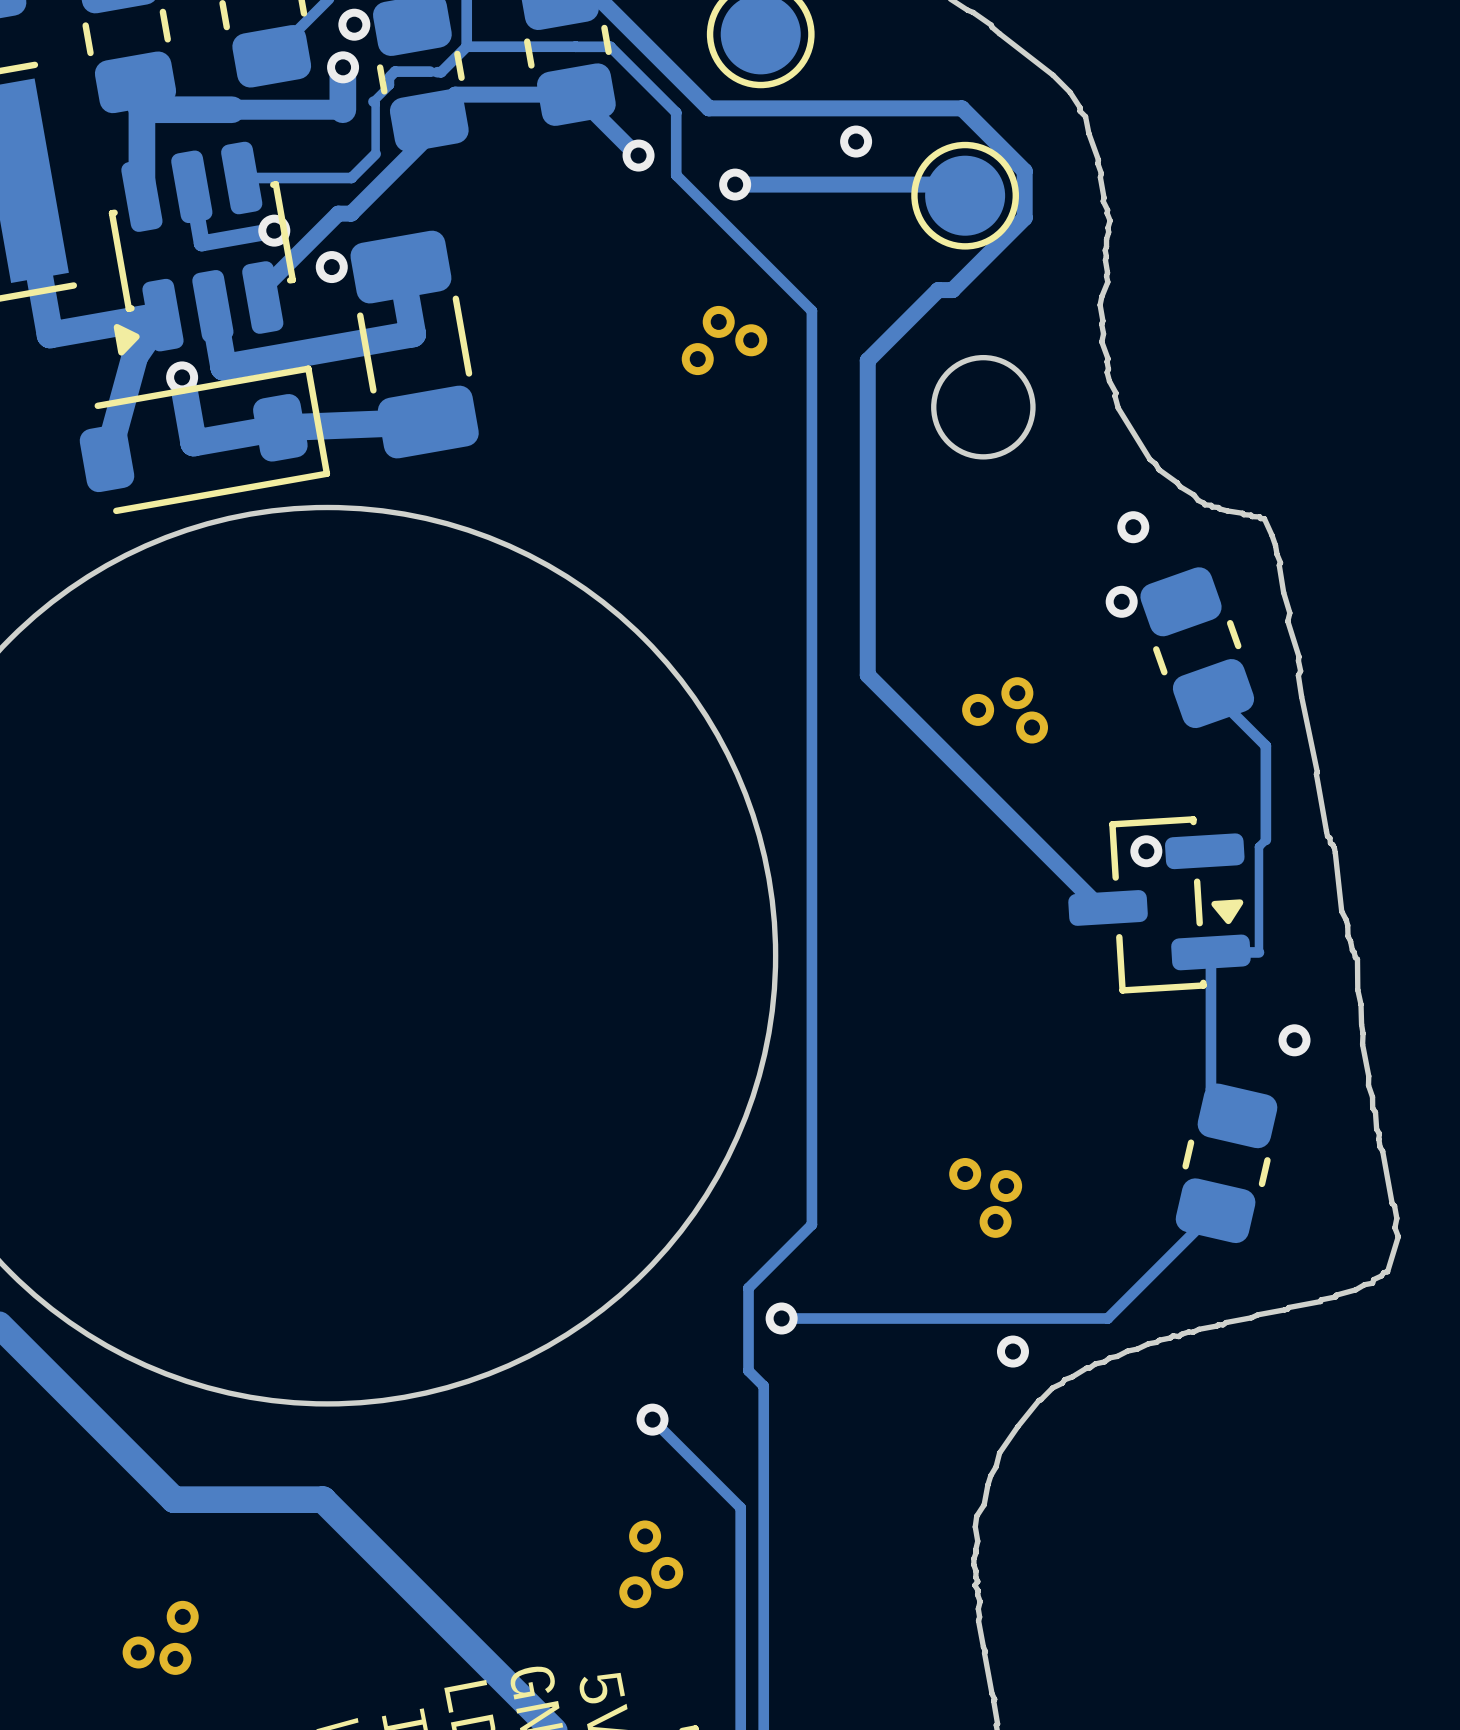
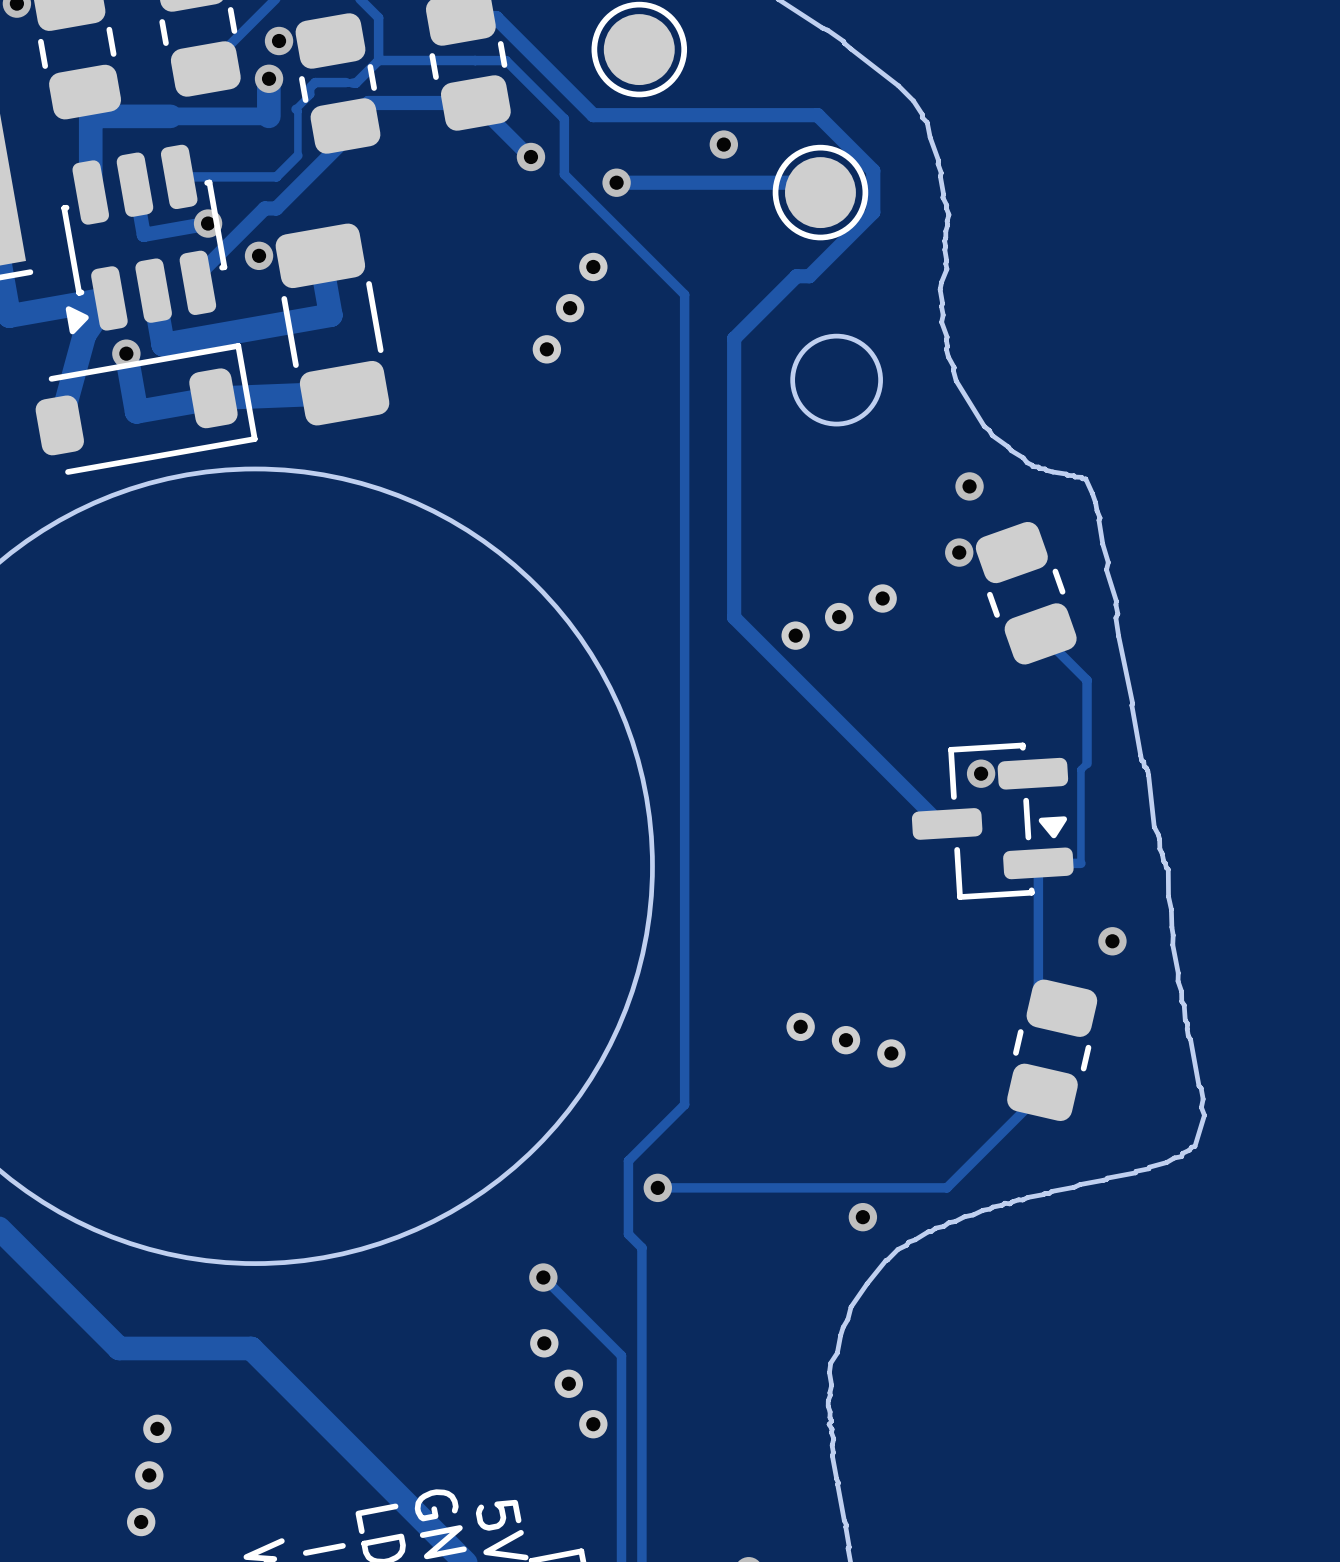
part footprint: [681, 305, 768, 376] -> [532, 252, 608, 364]
part footprint: [962, 677, 1049, 744] -> [781, 584, 897, 650]
part footprint: [949, 1158, 1023, 1238] -> [786, 1012, 906, 1068]
part footprint: [619, 1520, 684, 1609] -> [530, 1329, 608, 1439]
part footprint: [122, 1600, 199, 1675] -> [127, 1414, 172, 1537]

